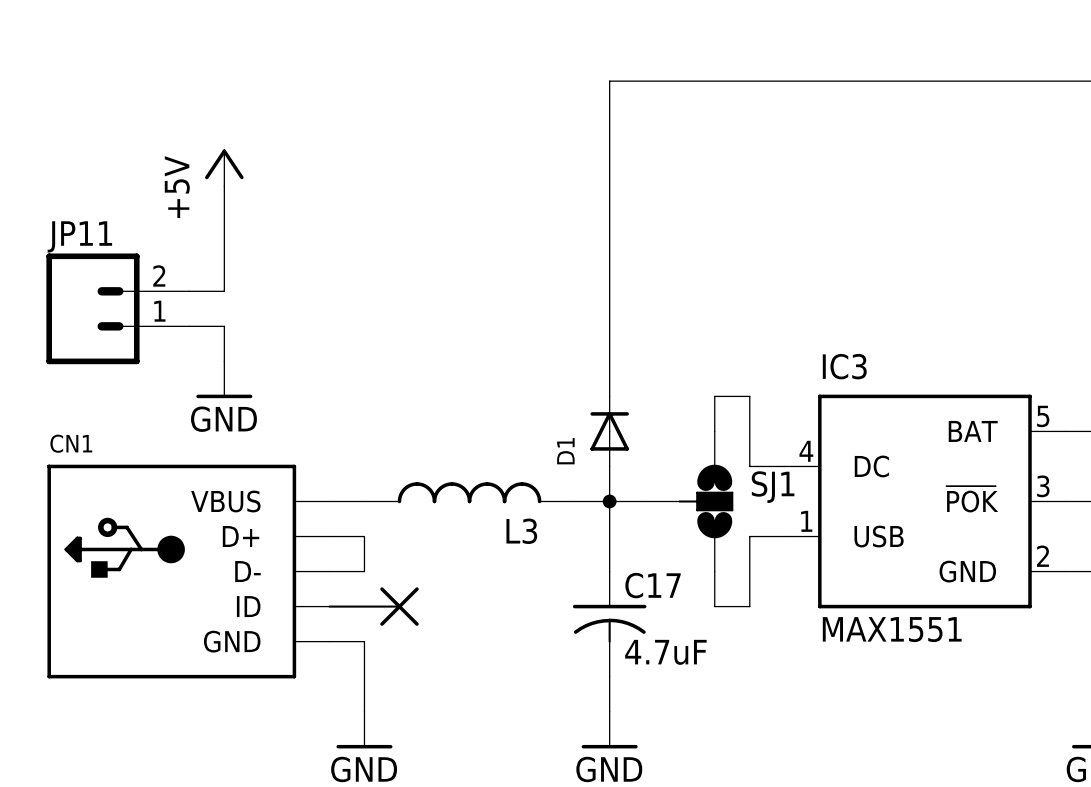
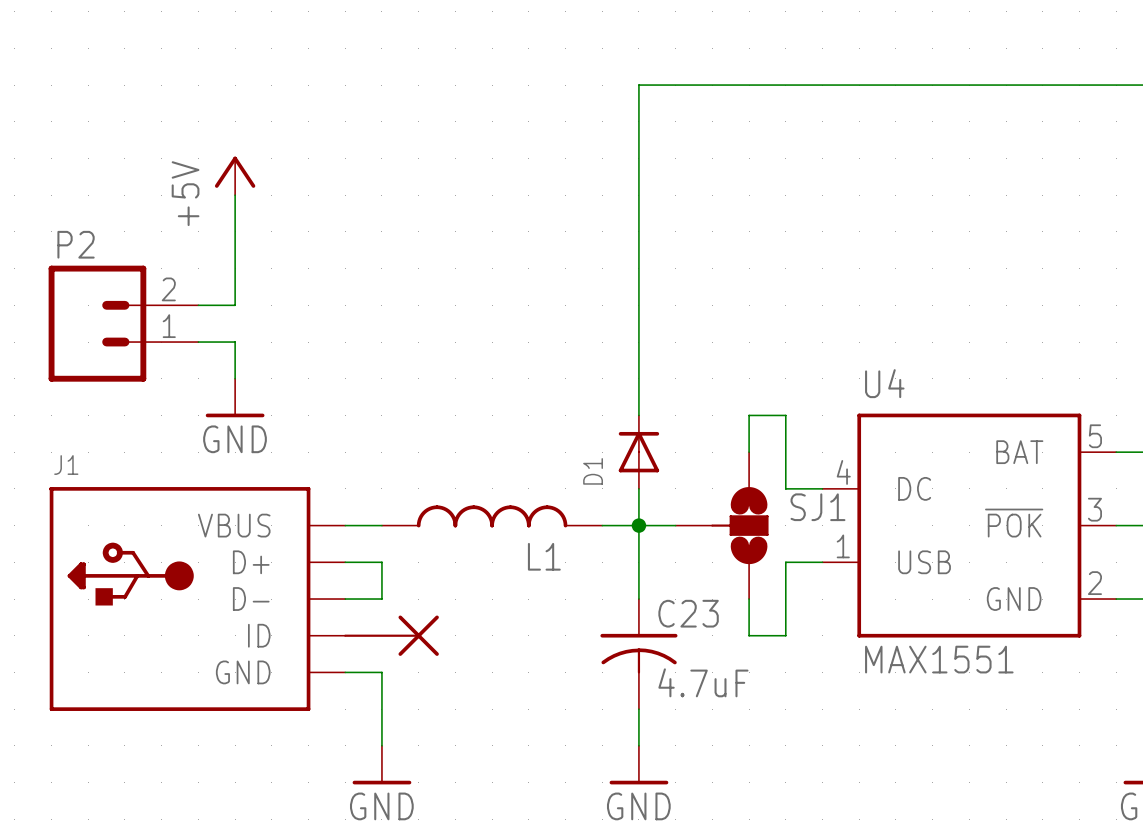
JP11 name: JP11 (79, 236) -> P2 (76, 244)
IC3 name: IC3 (844, 366) -> U4 (884, 383)
CN1 name: CN1 (71, 443) -> J1 (66, 465)
L3 name: L3 (521, 531) -> L1 (544, 556)
C17 name: C17 (653, 585) -> C23 (688, 613)

